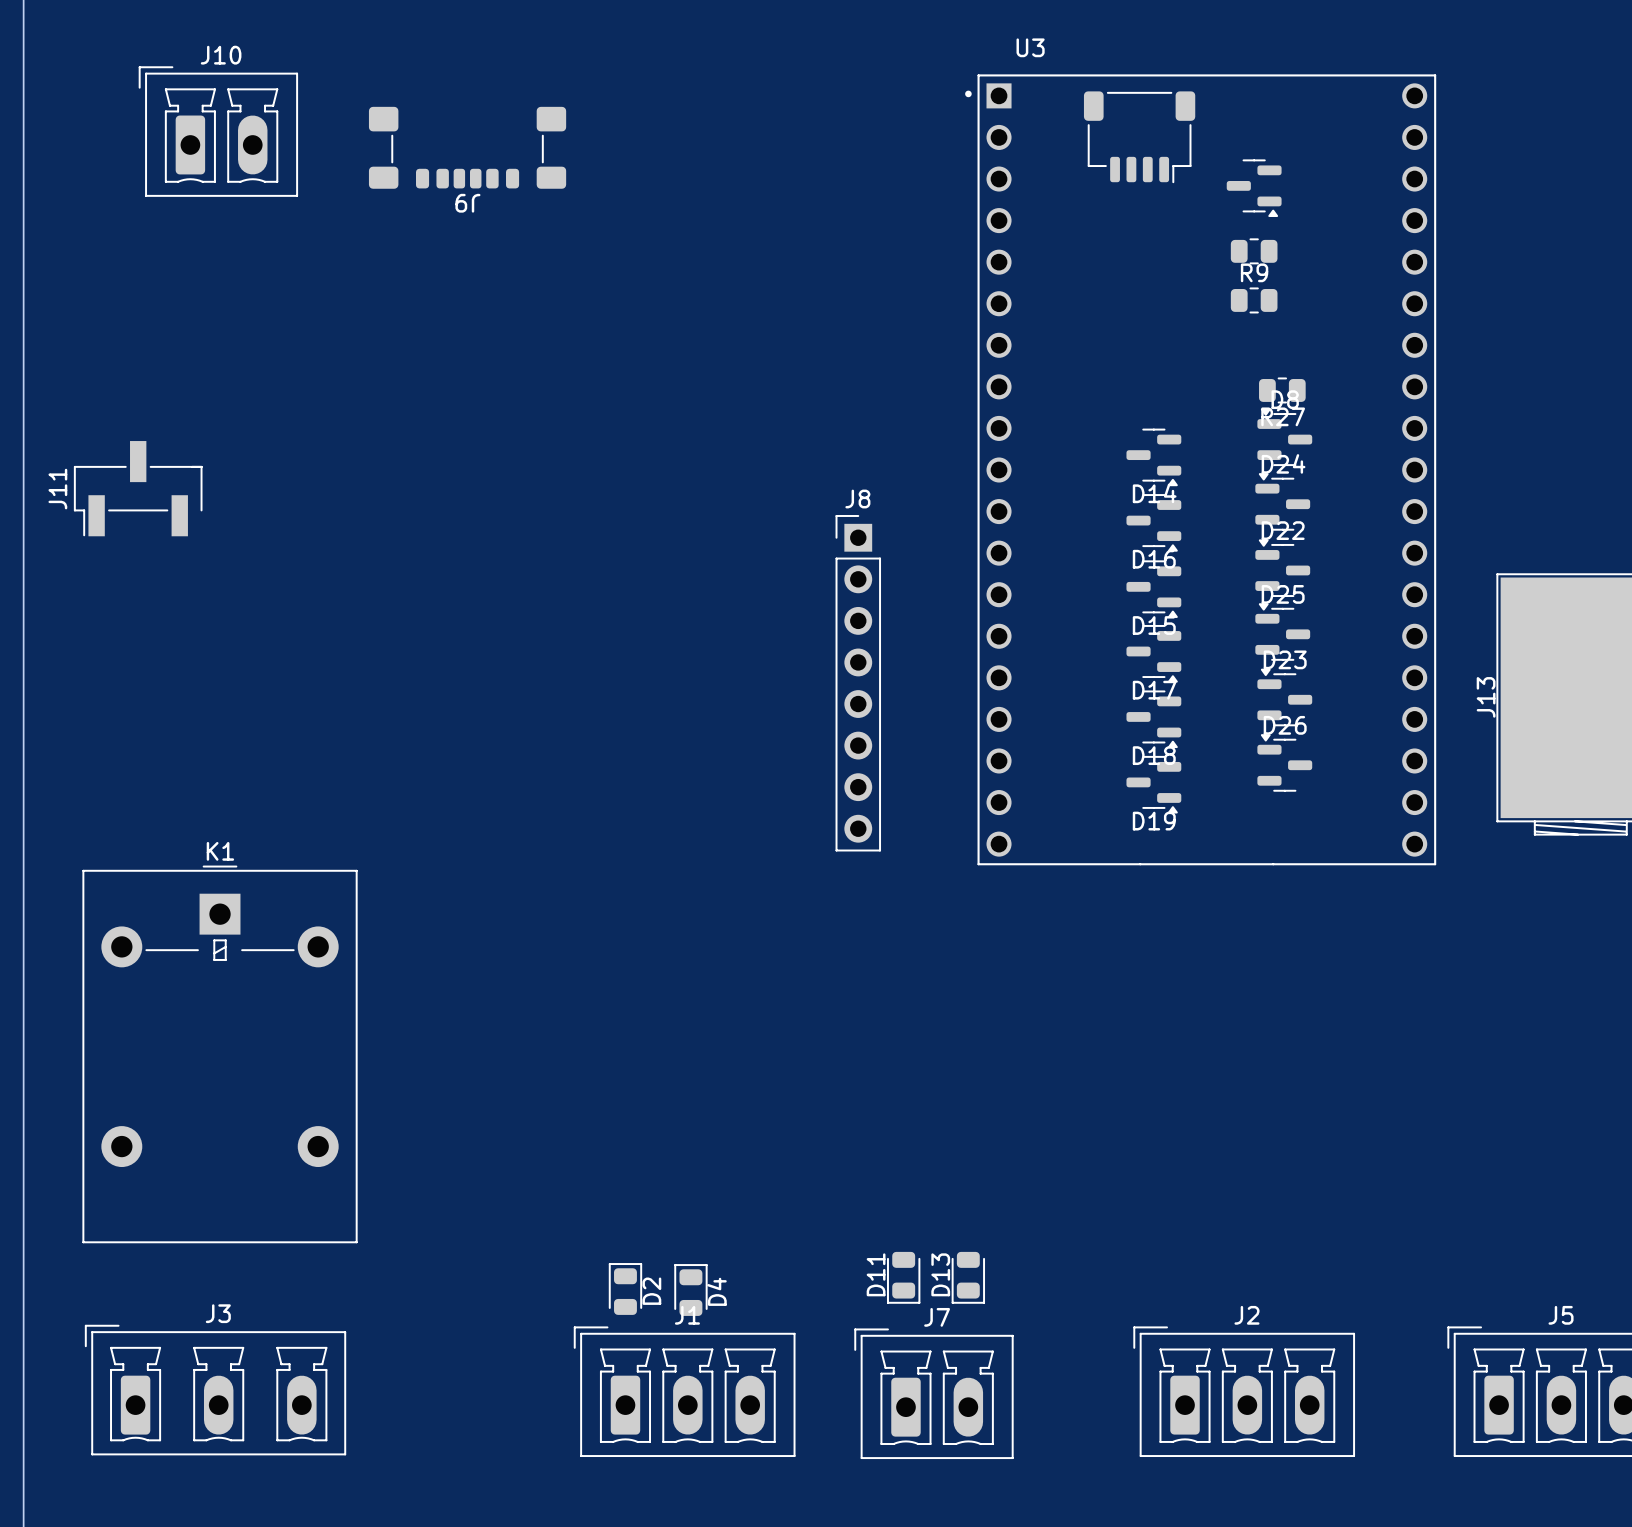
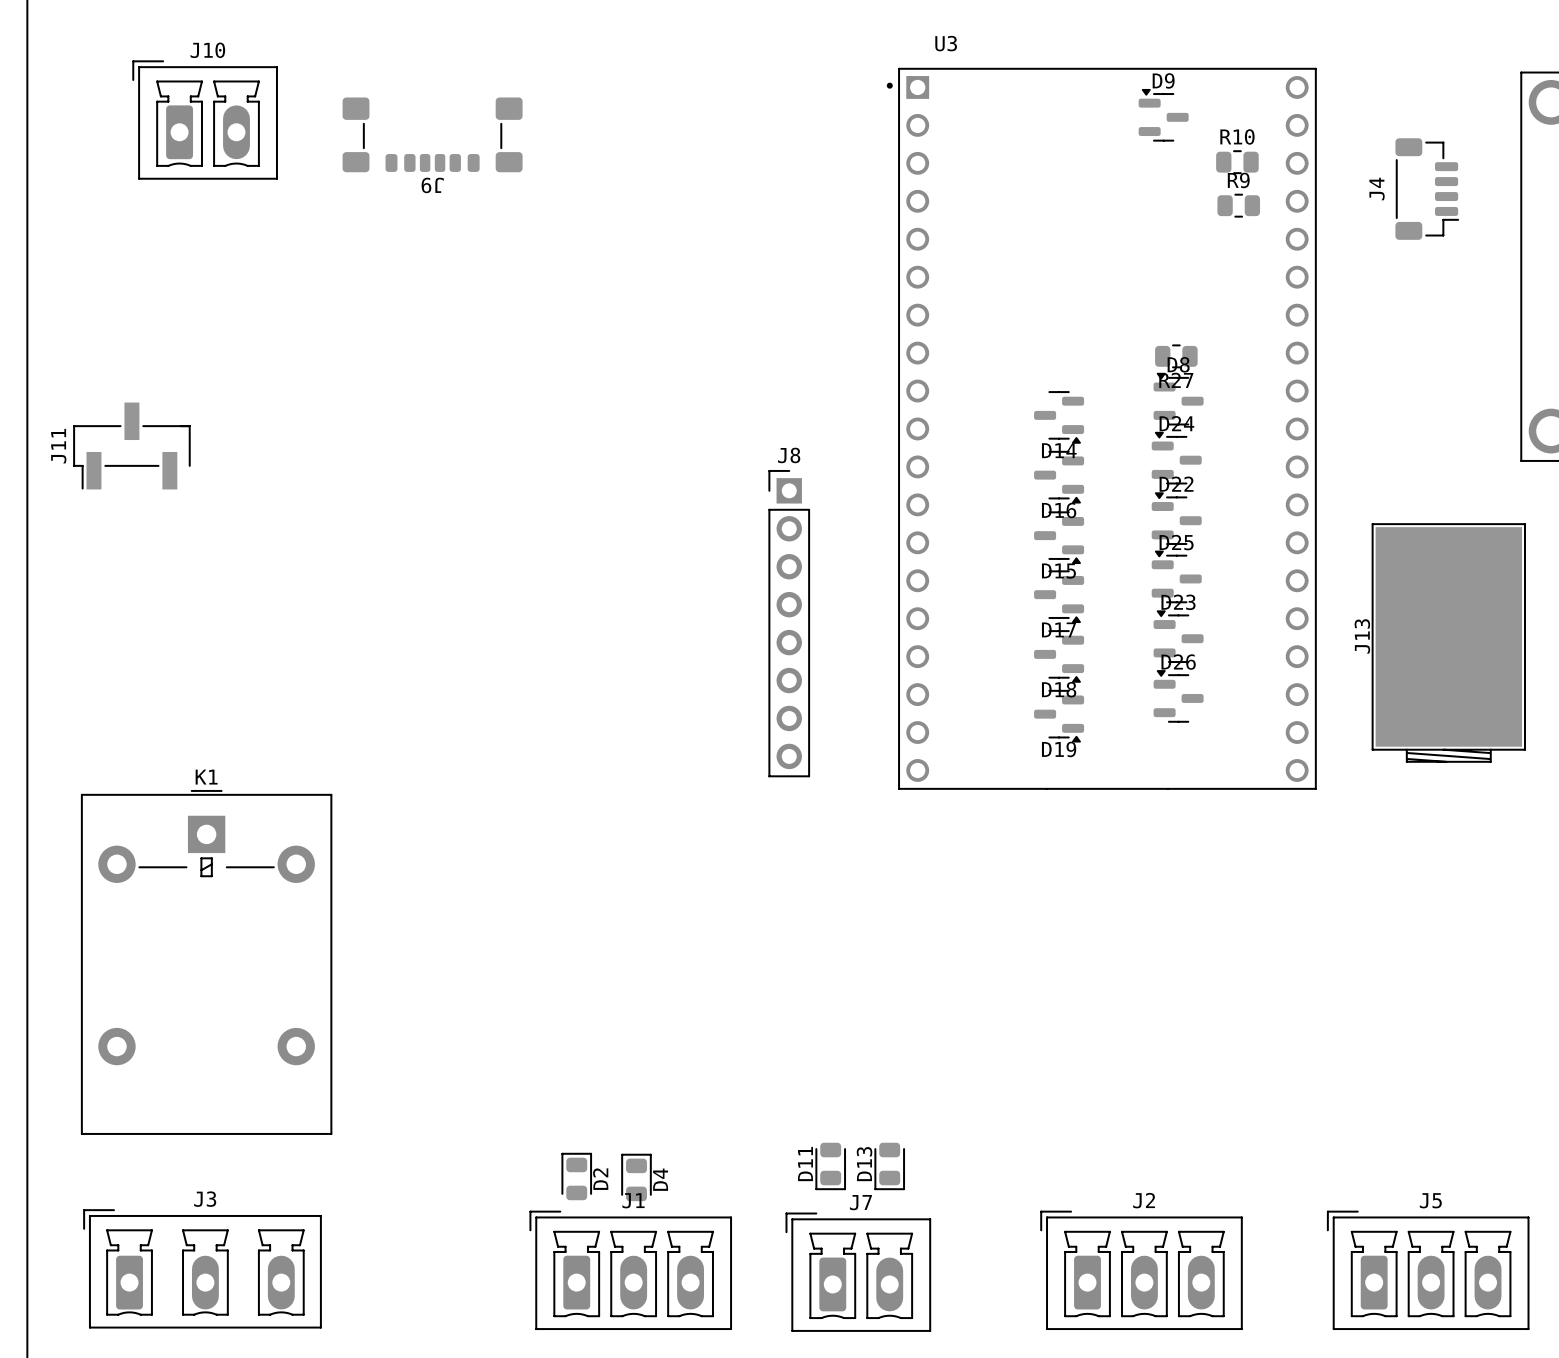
D9: none -> (1163, 115)
part: (1139, 137) -> none
R10: none -> (1237, 162)
part: (1254, 188) -> none
J4: none -> (1427, 189)
part: (1254, 251) -> none
R9 position: (1254, 300) -> (1238, 205)

